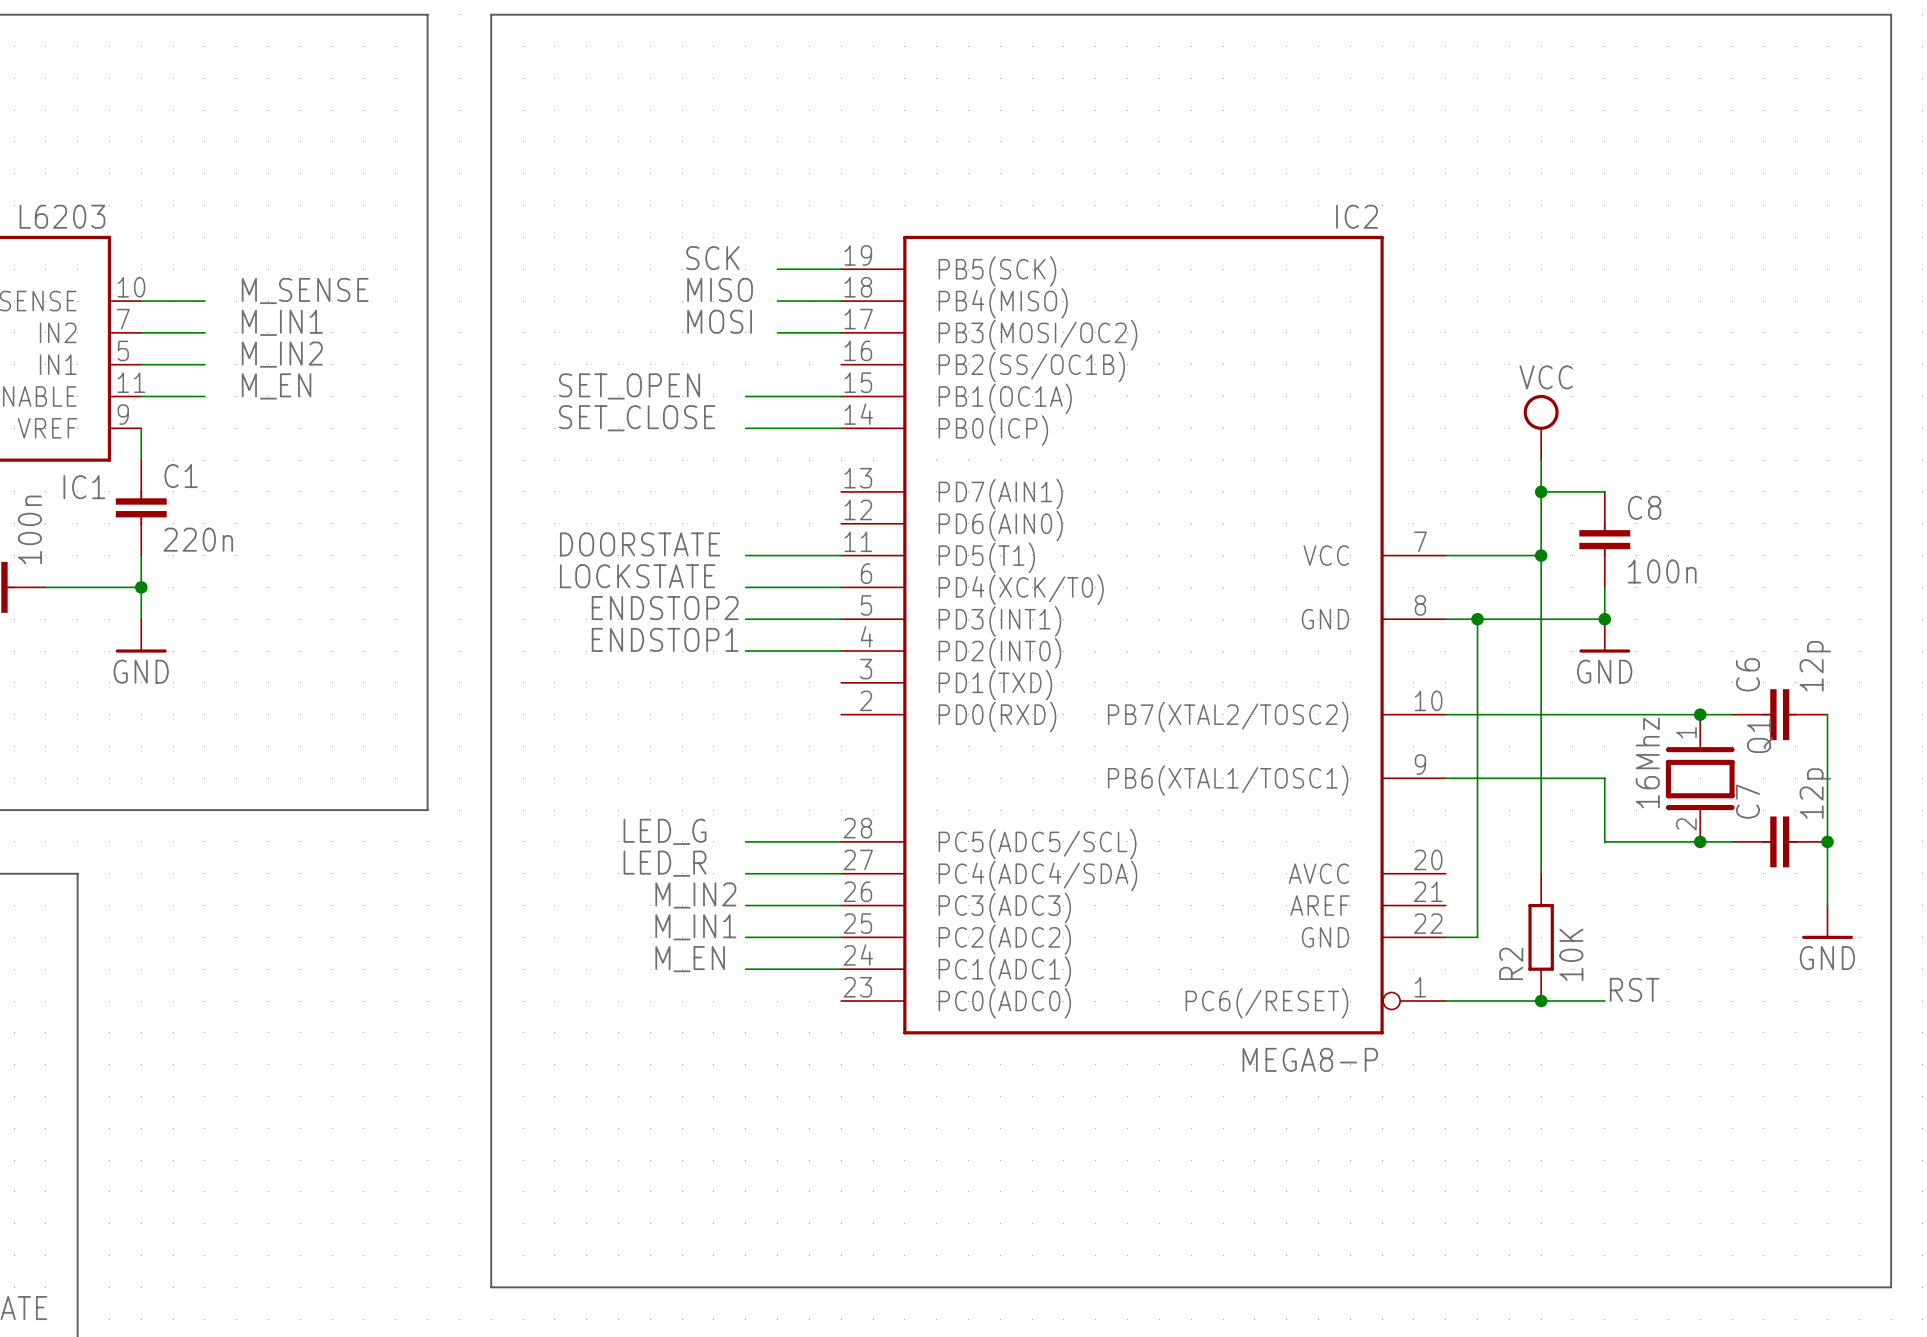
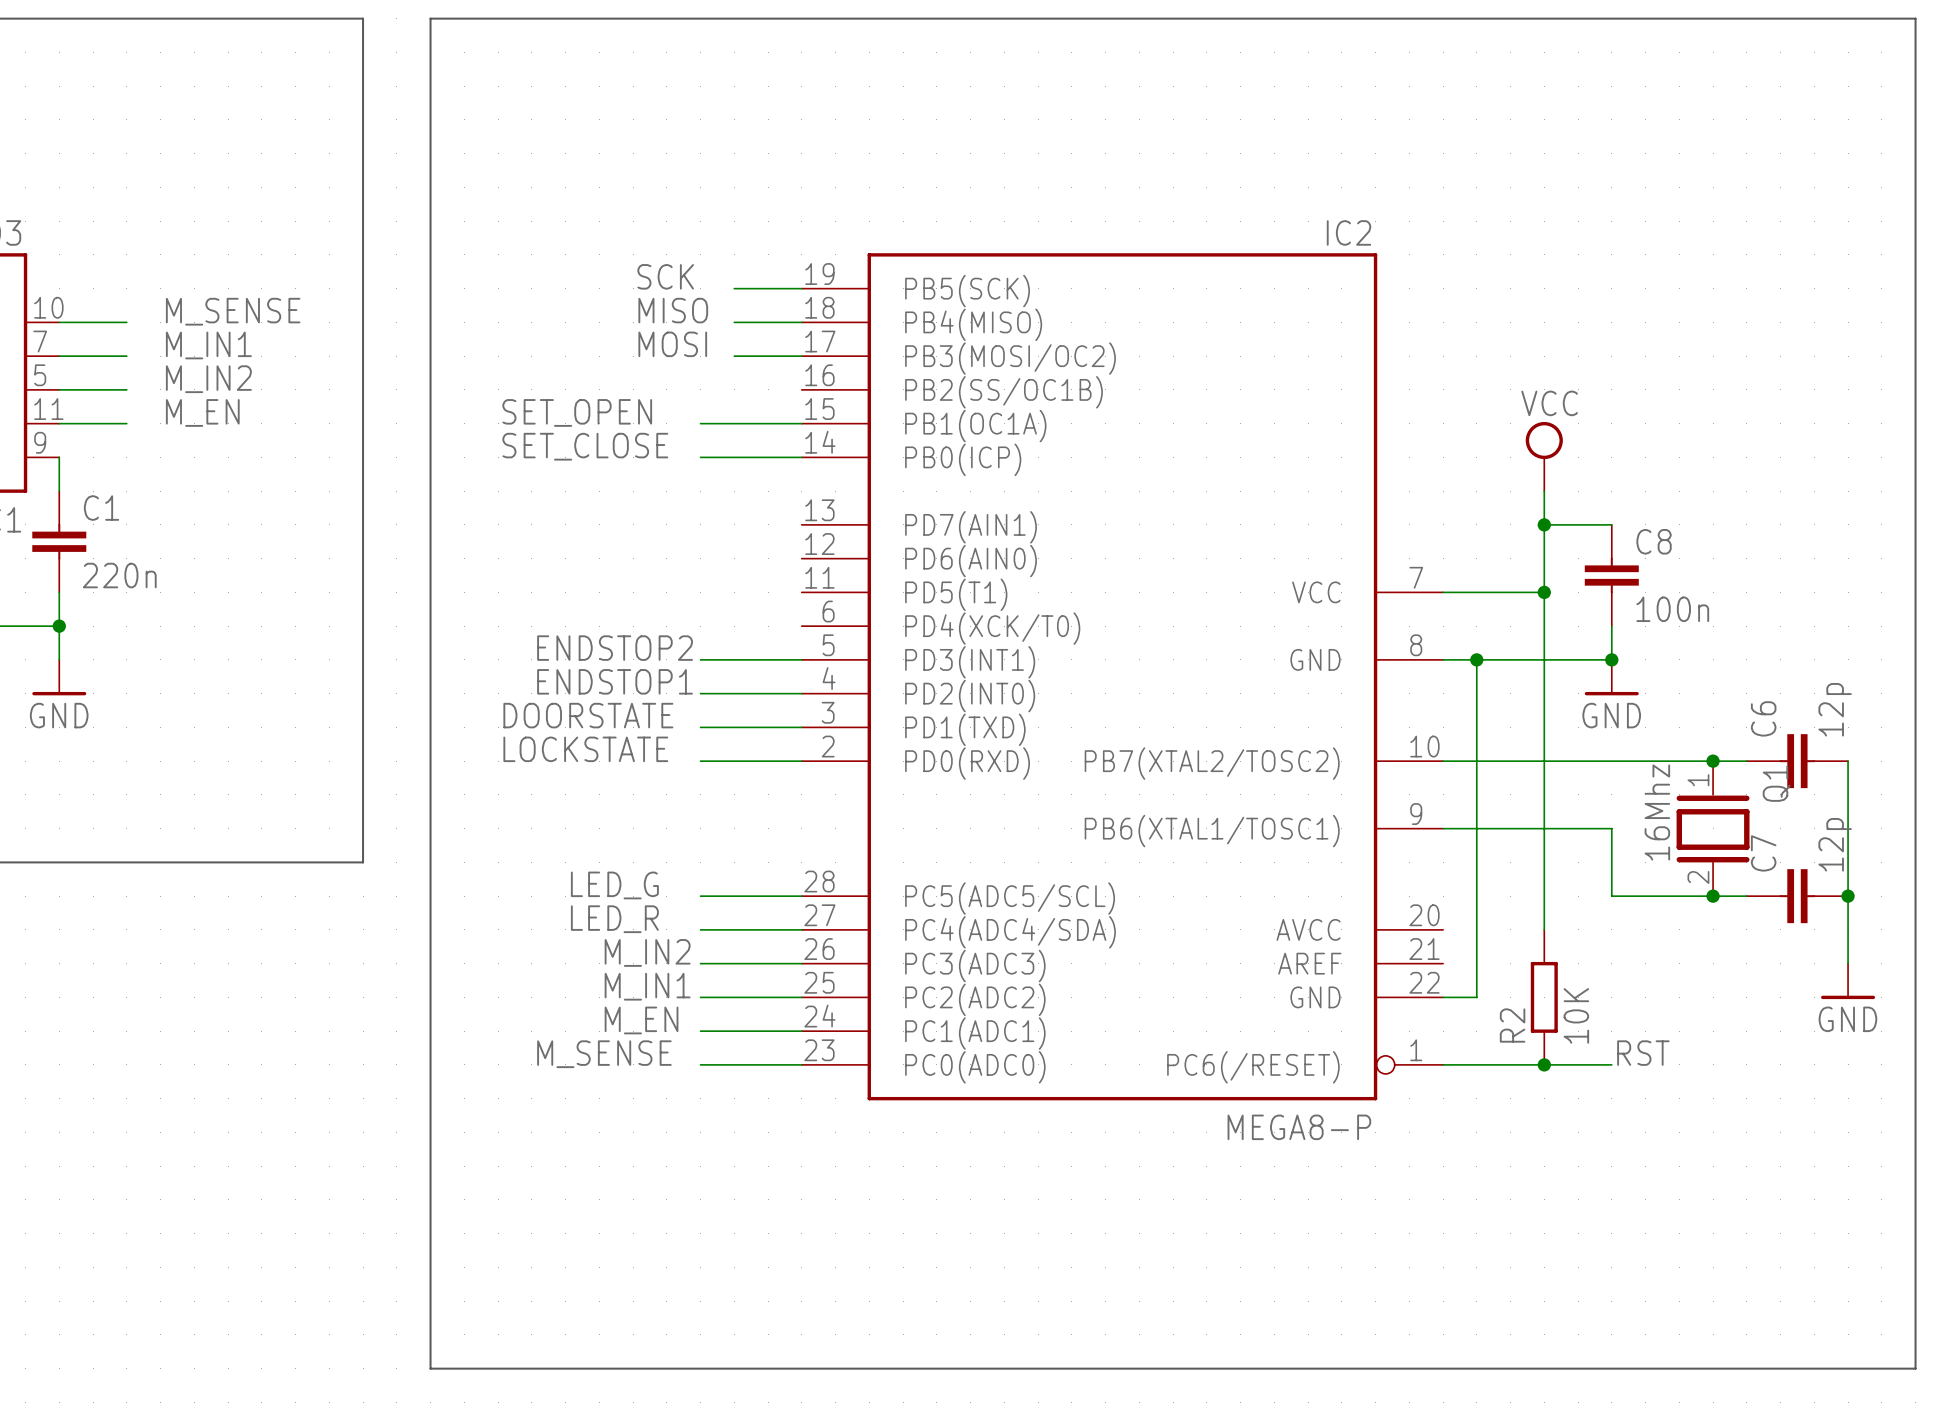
label position: DOORSTATE (640, 544) -> DOORSTATE (588, 715)
wire: (745, 555) (841, 555) -> (700, 761) (801, 761)
label position: LOCKSTATE (637, 576) -> LOCKSTATE (585, 749)
wire: (745, 587) (841, 587) -> (700, 727) (801, 727)
label: none -> M_SENSE (604, 1054)
wire: none -> (700, 1064) (801, 1064)

